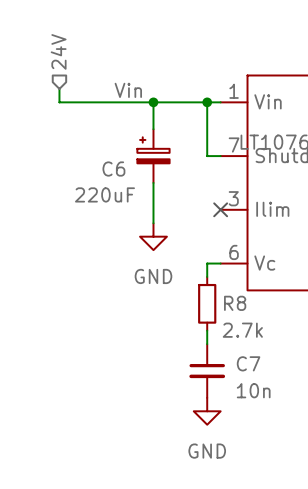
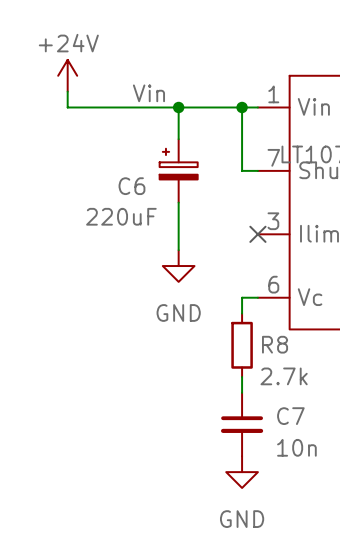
hierarchical label: 24V (58, 51) -> none
power symbol: none -> +24V (67, 75)

